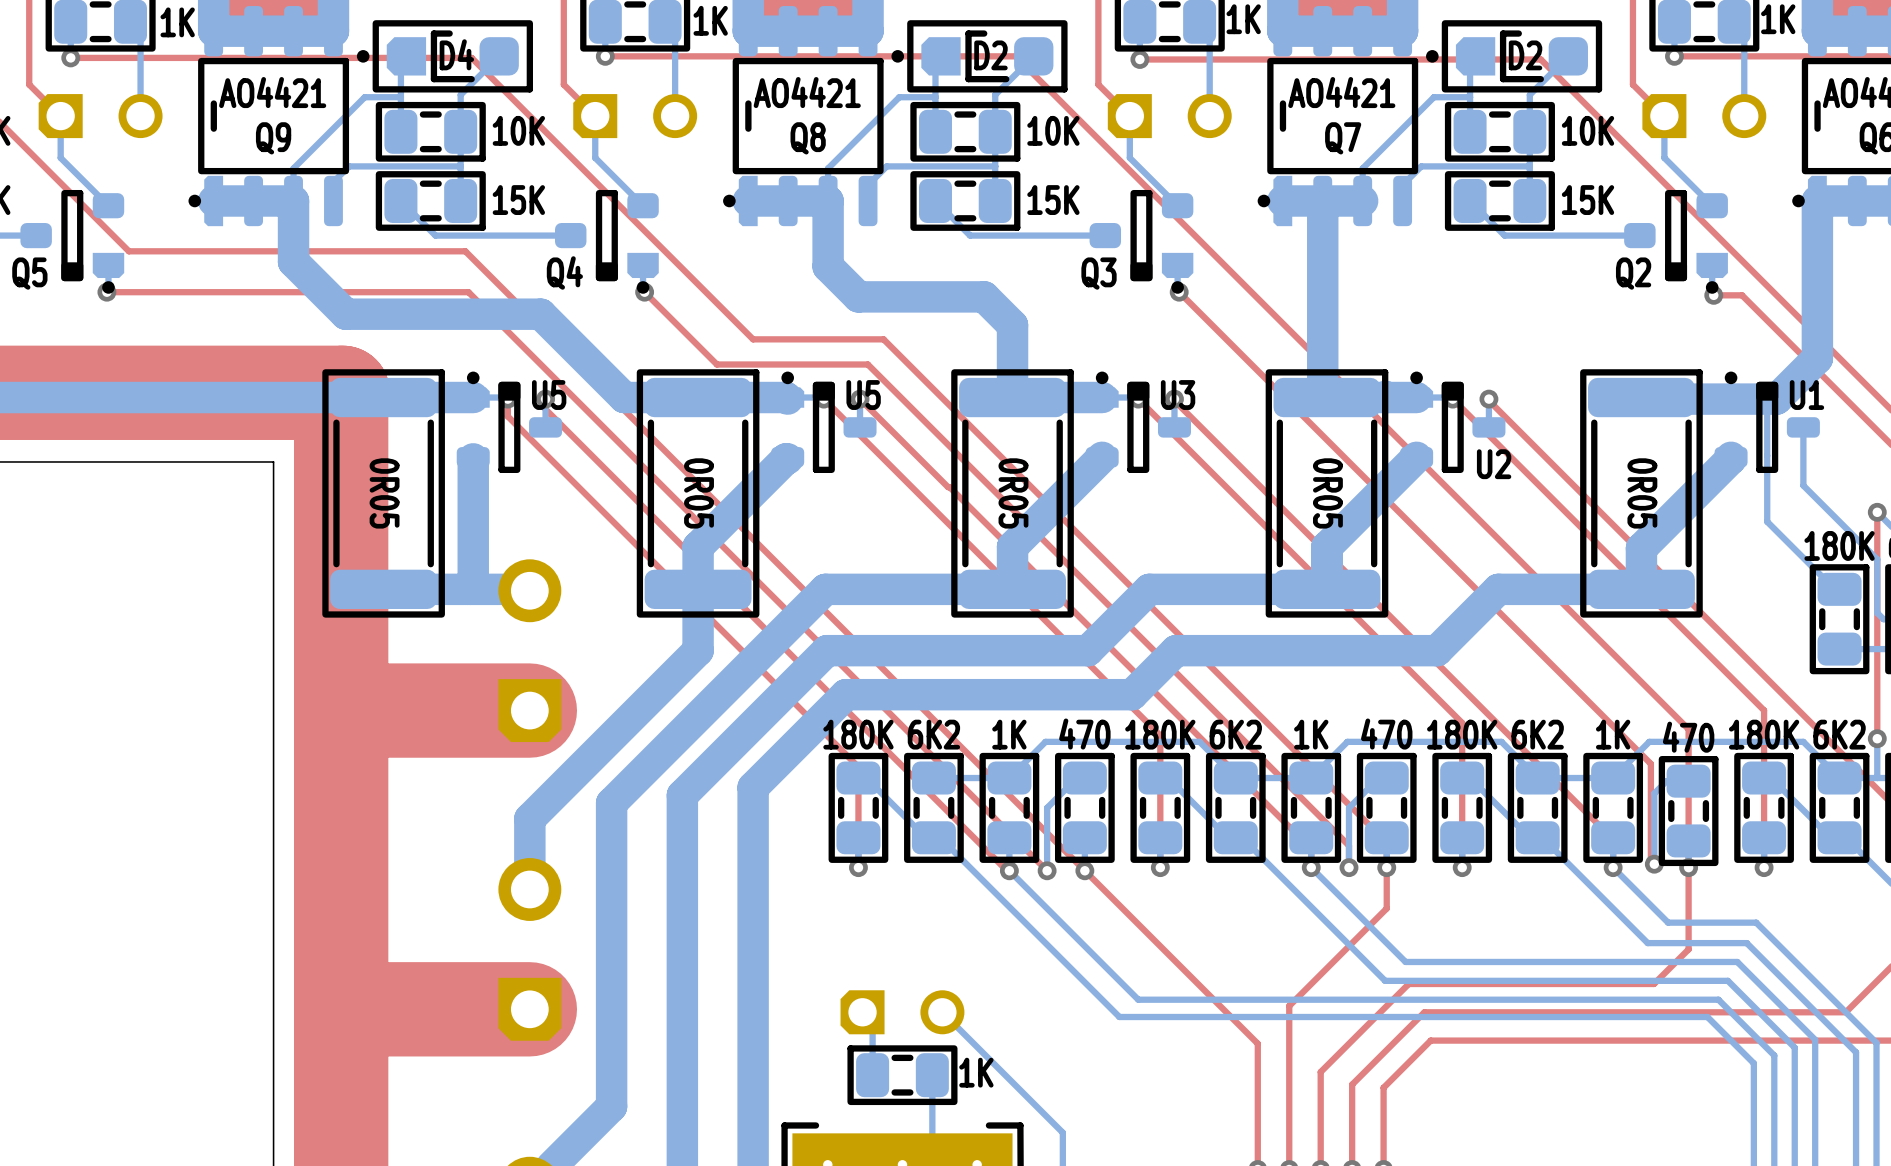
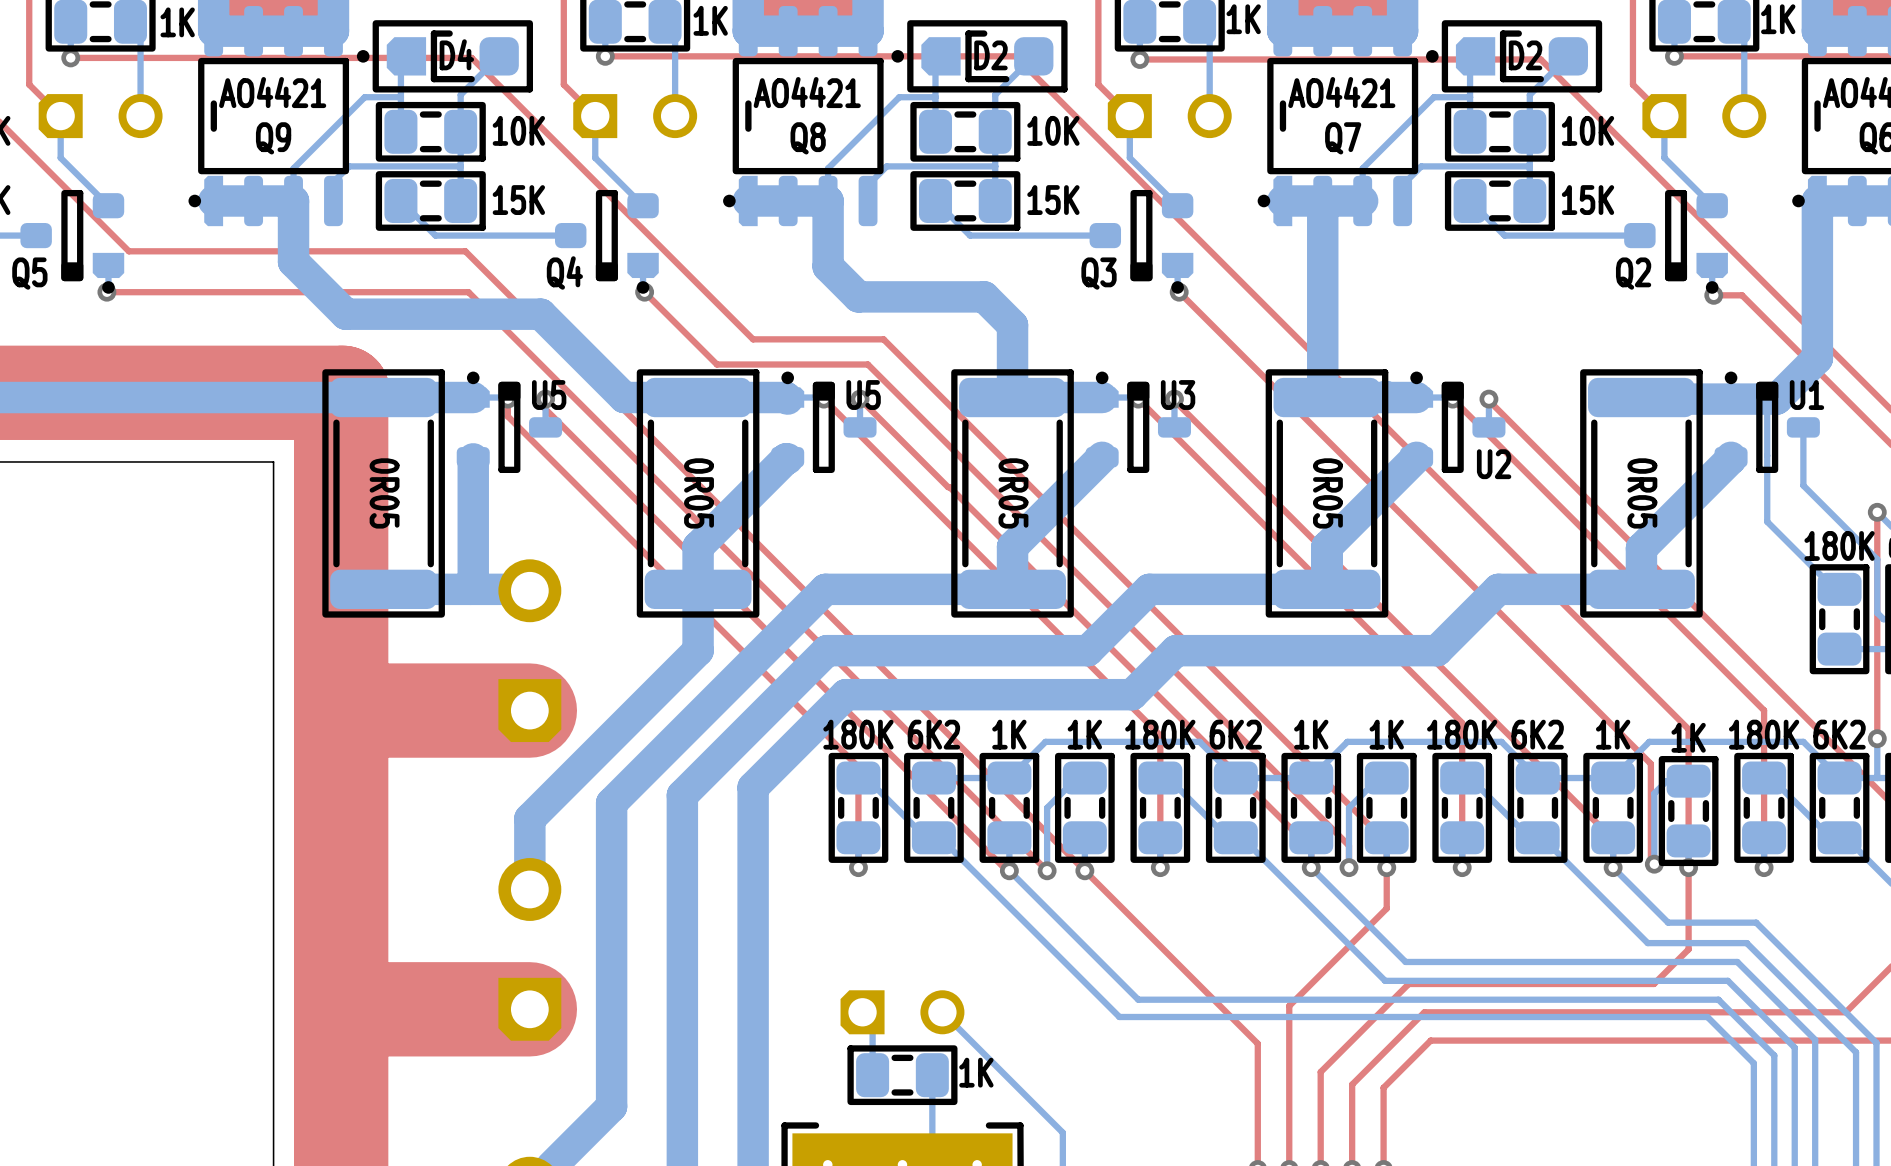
part value: 470 (1084, 734) -> 1K (1084, 734)
part value: 470 (1386, 734) -> 1K (1386, 734)
part value: 470 (1688, 737) -> 1K (1688, 737)

